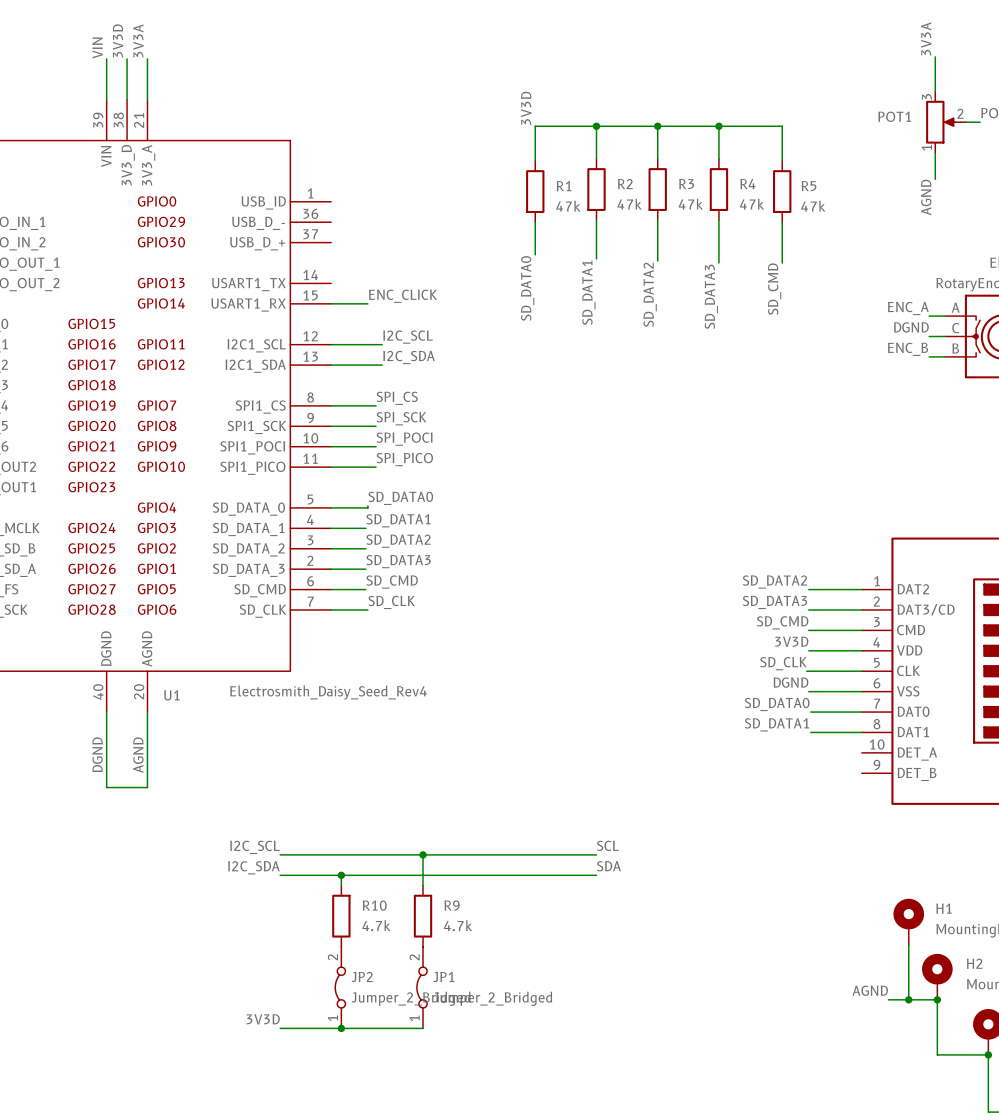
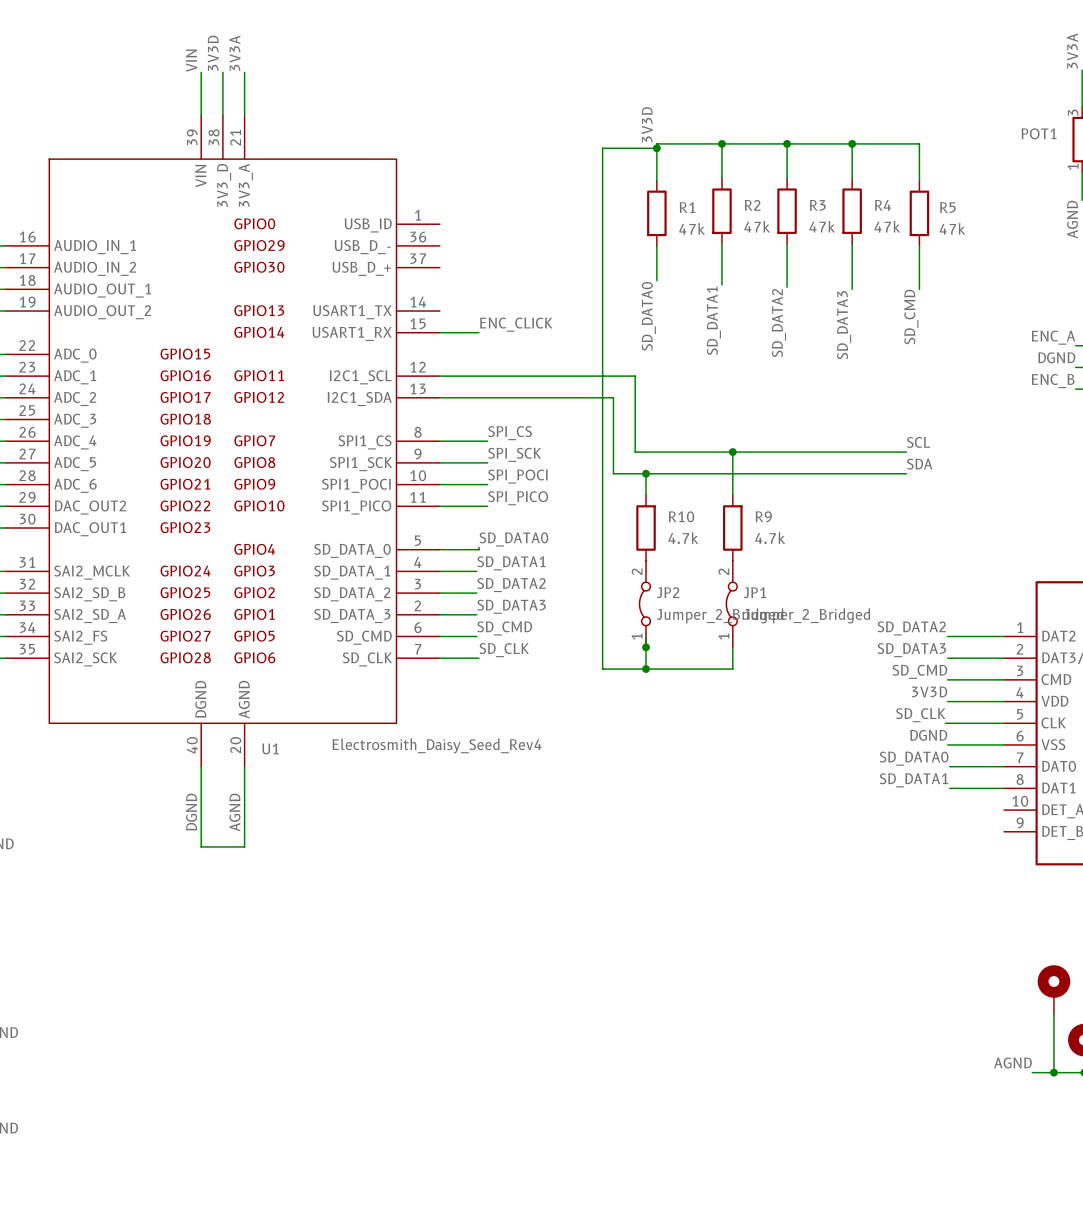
wire: none -> (656, 148) (602, 148) (602, 669) (732, 669) (732, 647)
junction: none -> (656, 148)
label: I2C_SCL (408, 337) -> none
wire: none -> (494, 376) (635, 376) (635, 452) (906, 452)
label: I2C_SDA (409, 357) -> none
wire: none -> (494, 397) (613, 397) (613, 473) (906, 473)
label: none -> SCL (918, 442)
wire: none -> (732, 452) (732, 495)
junction: none -> (732, 452)
label: none -> SDA (919, 464)
wire: none -> (646, 473) (646, 495)
junction: none -> (646, 473)
wire: none -> (646, 636) (646, 669)
junction: none -> (646, 647)
junction: none -> (646, 669)
label: SCL (607, 845) -> none
label: I2C_SCL (254, 847) -> none
wire: (280, 854) (596, 854) -> none
wire: (423, 854) (423, 885) -> none
junction: (423, 854) -> none
label: SDA (608, 866) -> none
label: I2C_SDA (253, 867) -> none
wire: (280, 875) (596, 875) -> none
wire: (341, 875) (341, 885) -> none
junction: (341, 875) -> none
R10 position: (341, 916) -> (646, 528)
R9 position: (423, 916) -> (732, 528)
JP2 position: (340, 987) -> (644, 603)
JP1 position: (421, 987) -> (731, 603)
label: 3V3D (263, 1019) -> none
wire: (280, 1028) (423, 1028) -> none
junction: (341, 1028) -> none

